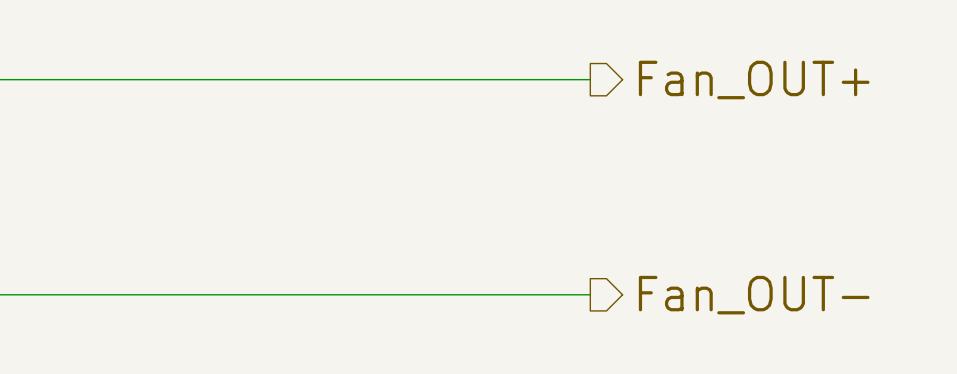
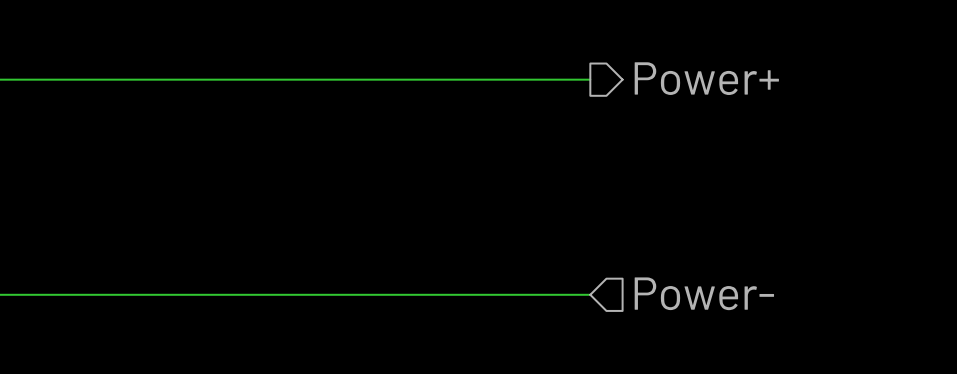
hierarchical label: Fan_OUT+ (754, 80) -> Power+ (706, 78)
hierarchical label shape: output (754, 295) -> input (704, 293)
hierarchical label: Fan_OUT- (754, 295) -> Power- (704, 293)

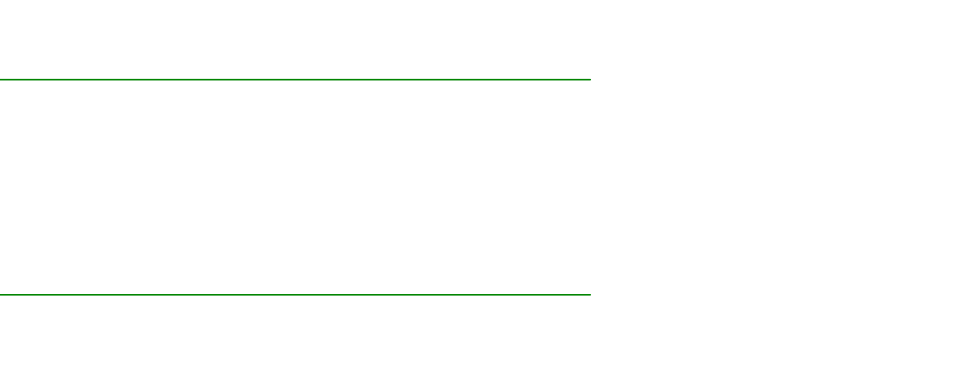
hierarchical label: Power+ (706, 78) -> none
hierarchical label: Power- (704, 293) -> none

